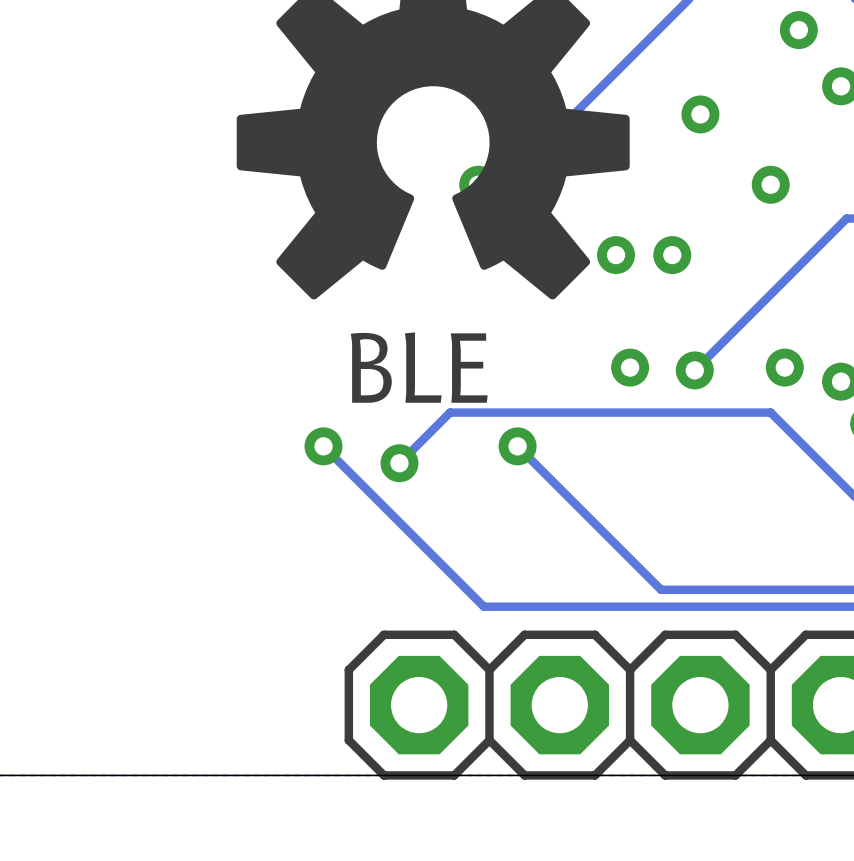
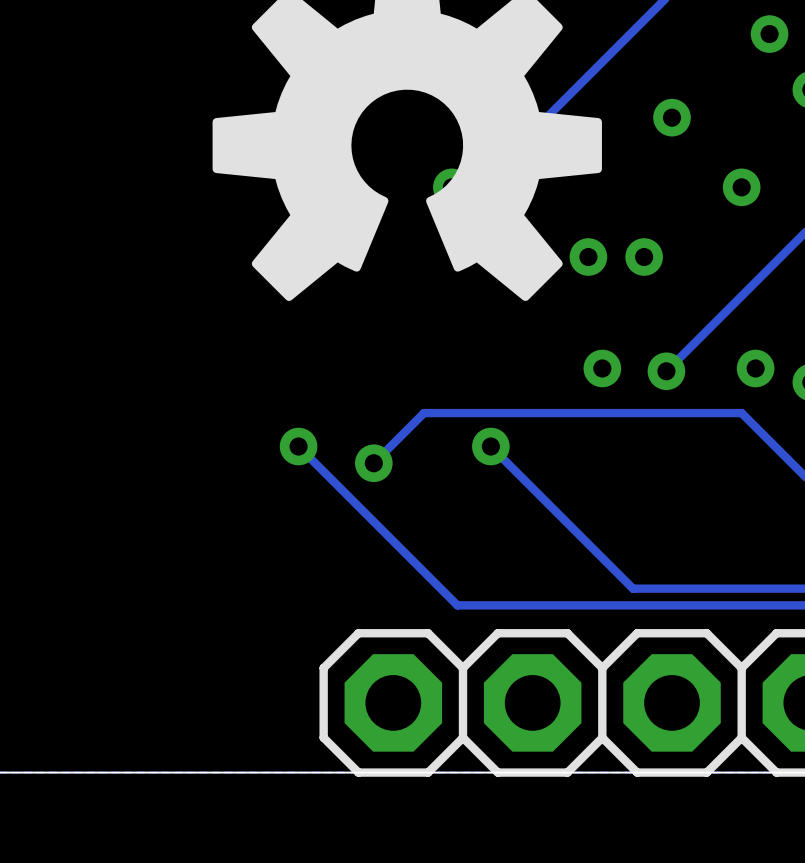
text: BLE (419, 367) -> none

